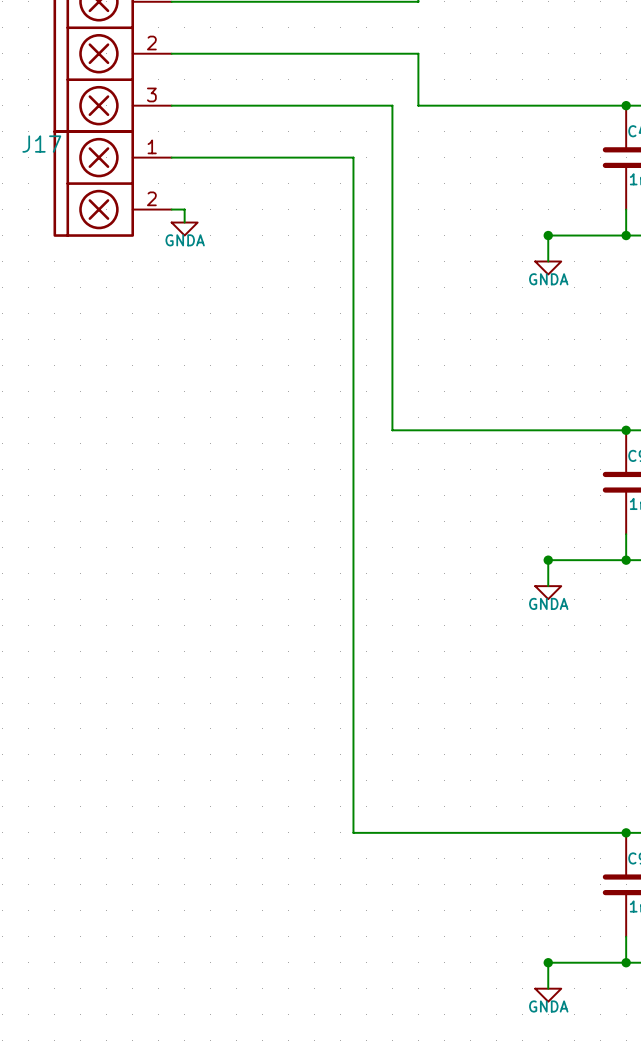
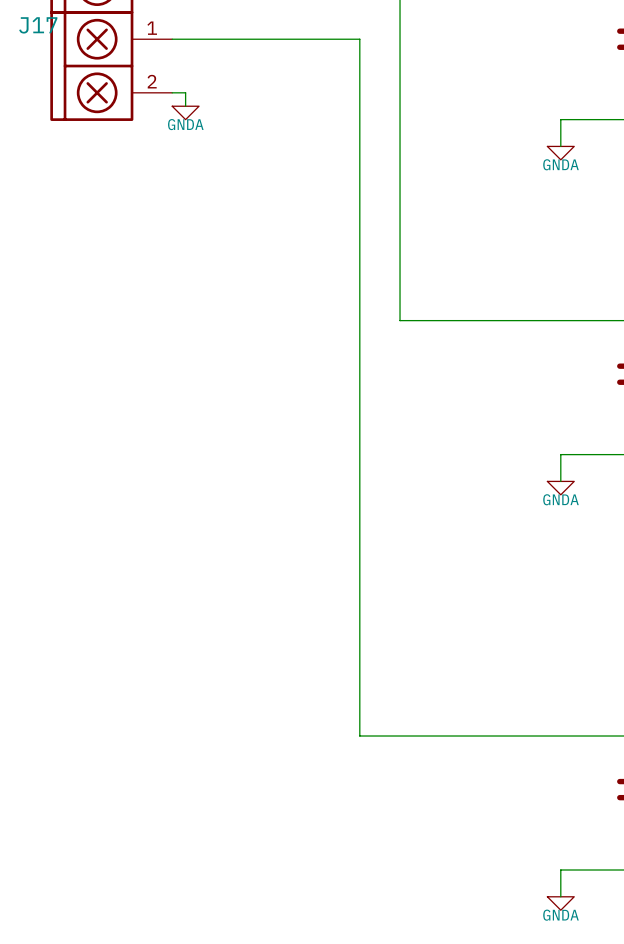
junction: (548, 235) -> none
junction: (548, 560) -> none
junction: (548, 962) -> none

